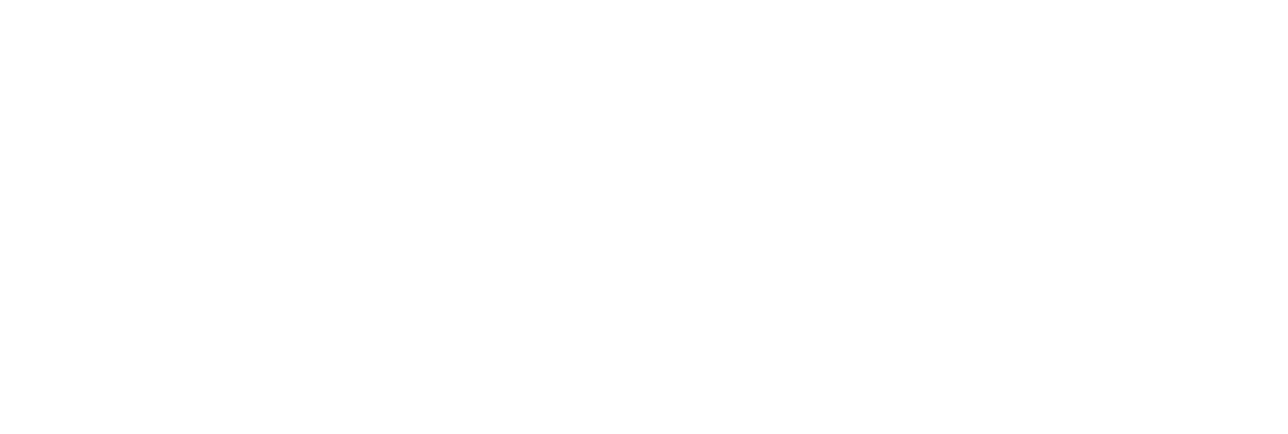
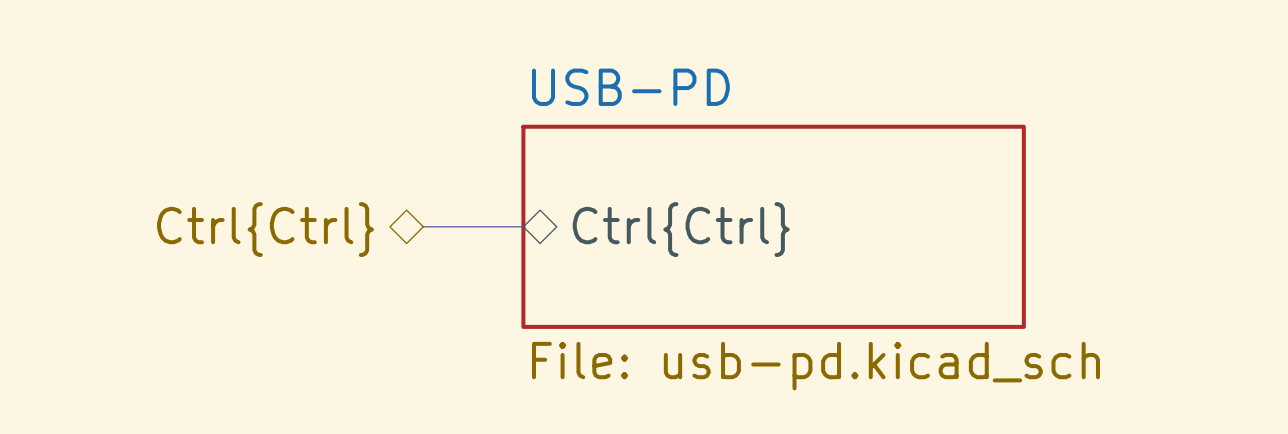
bus: none -> (423, 226) (523, 226)
sheet USB-PD: none -> File: usb-pd.kicad_sch (773, 226)
hierarchical label: none -> Ctrl{Ctrl} (265, 229)
sheet pin: none -> Ctrl{Ctrl} (681, 229)

